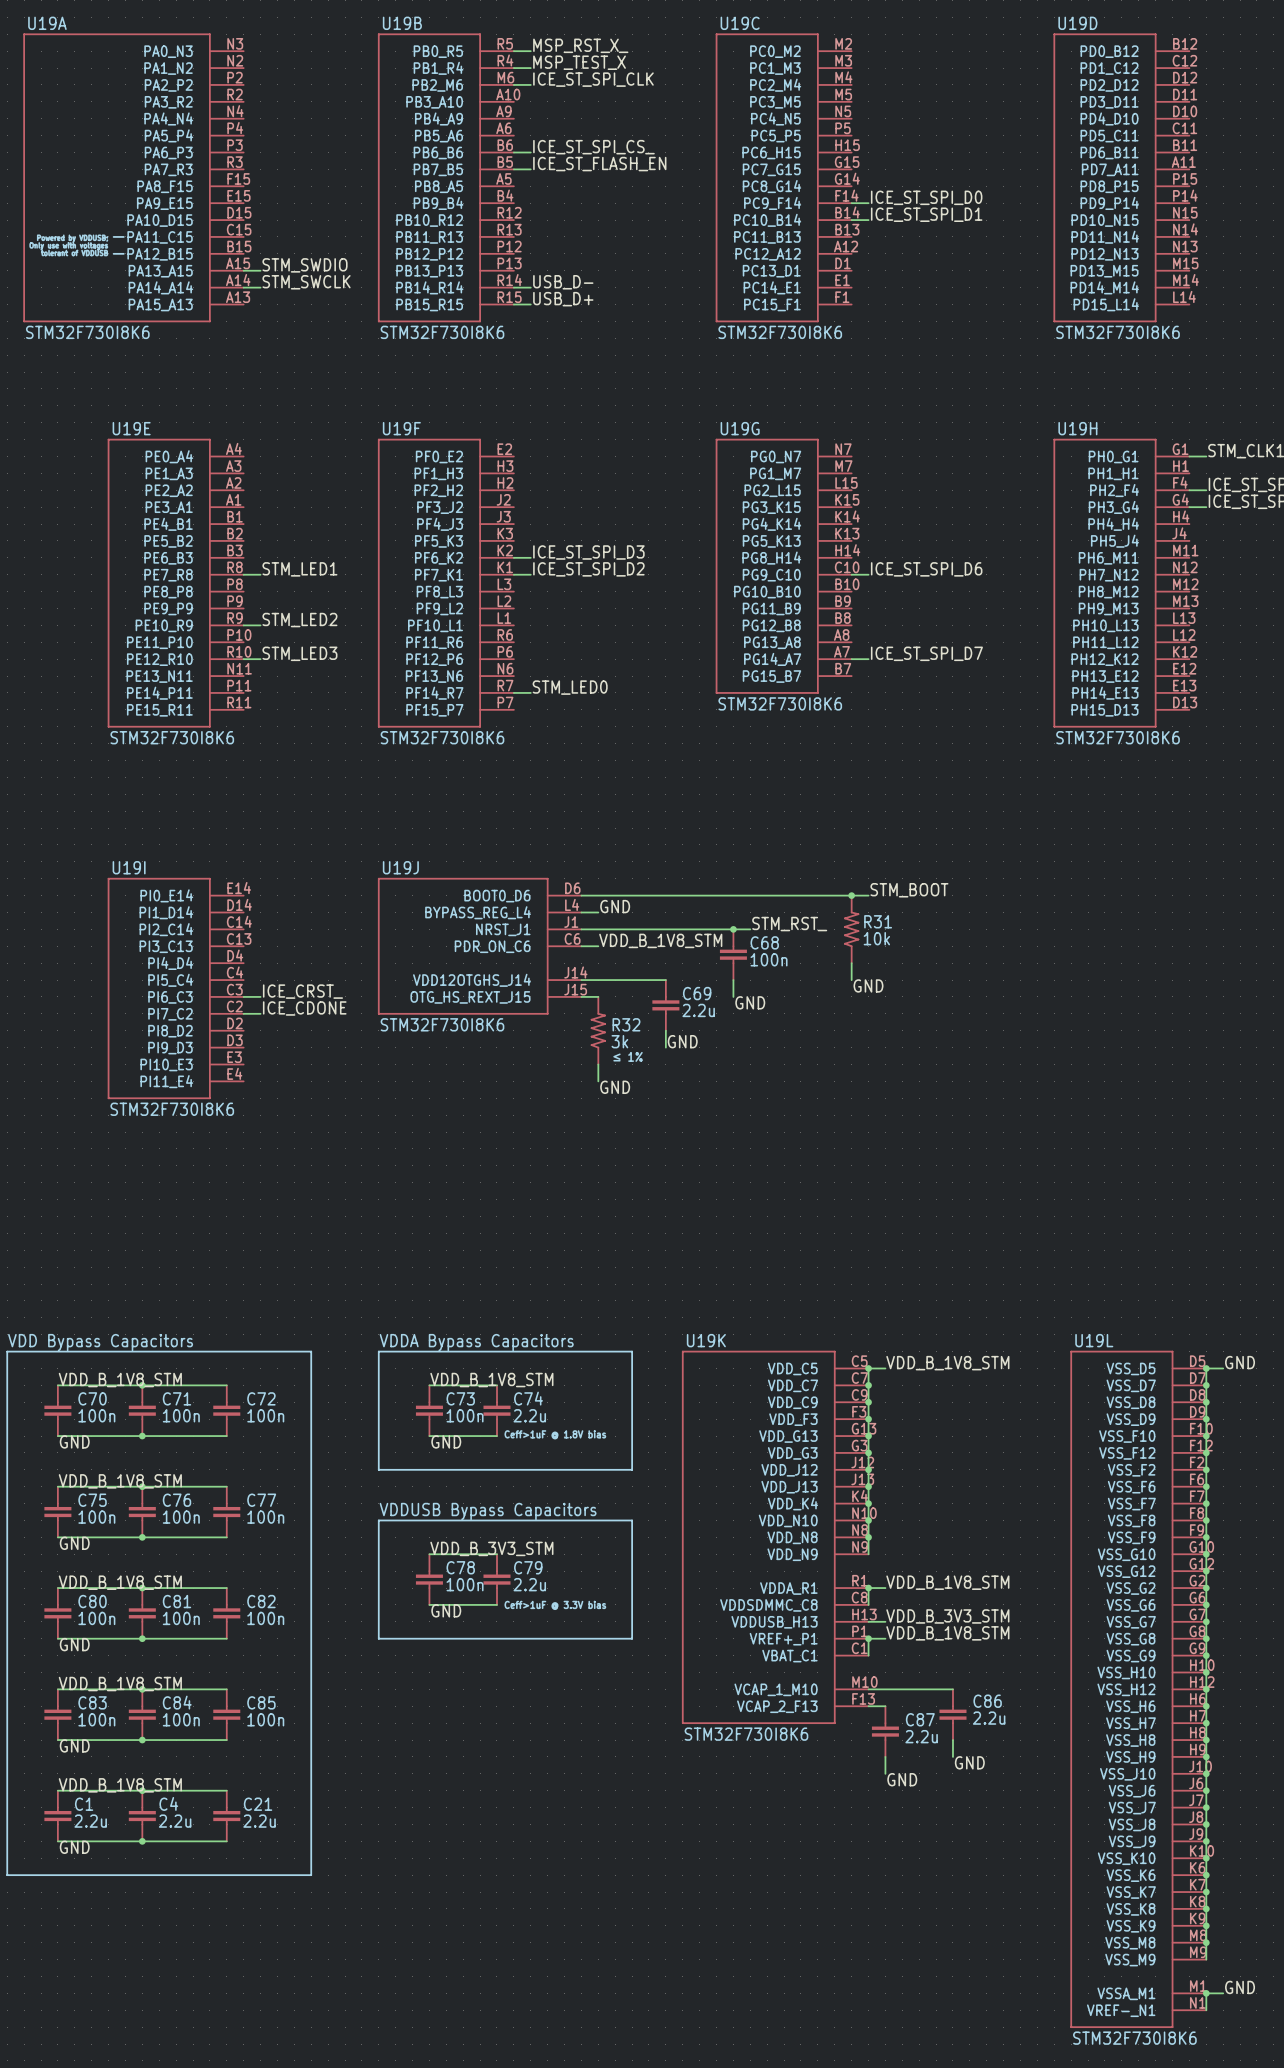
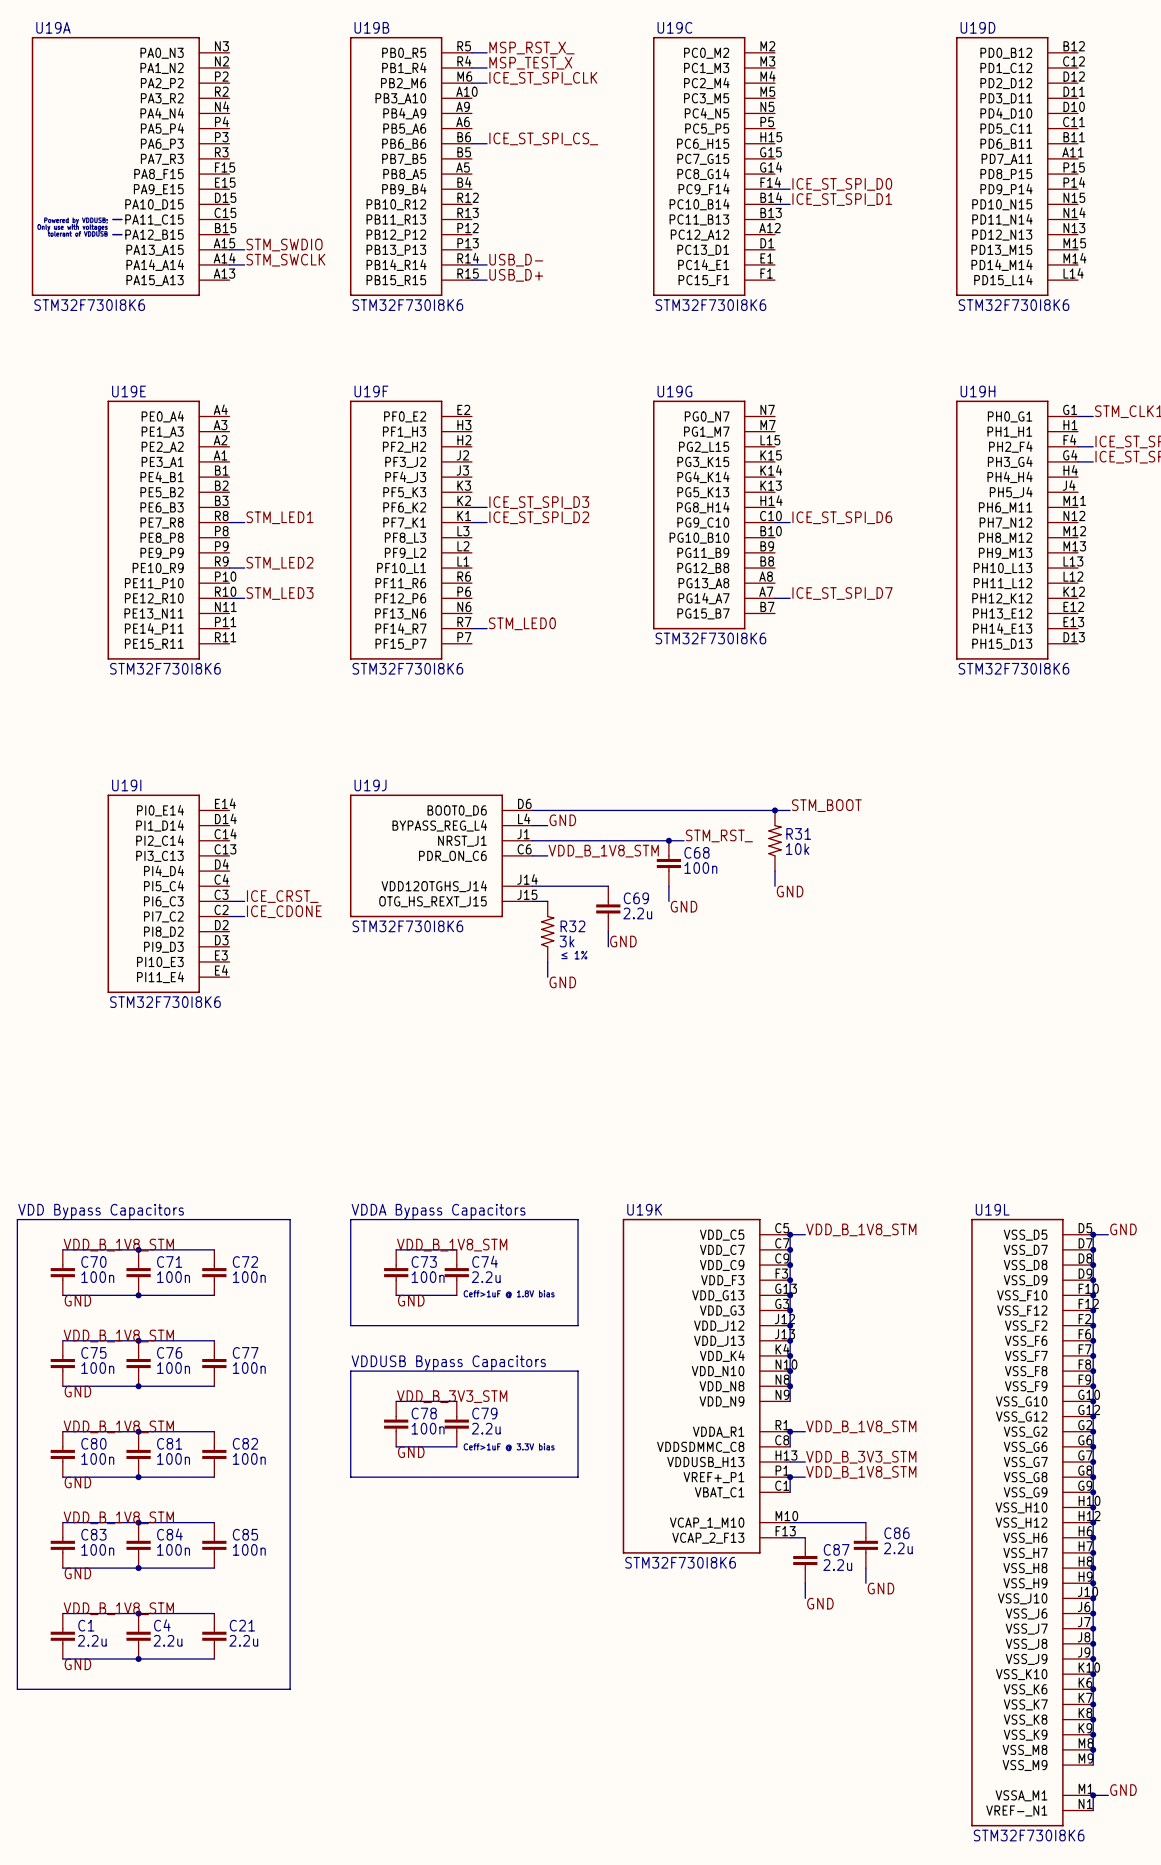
label: ICE_ST_FLASH_EN (599, 164) -> none
wire: (513, 169) (530, 169) -> none

